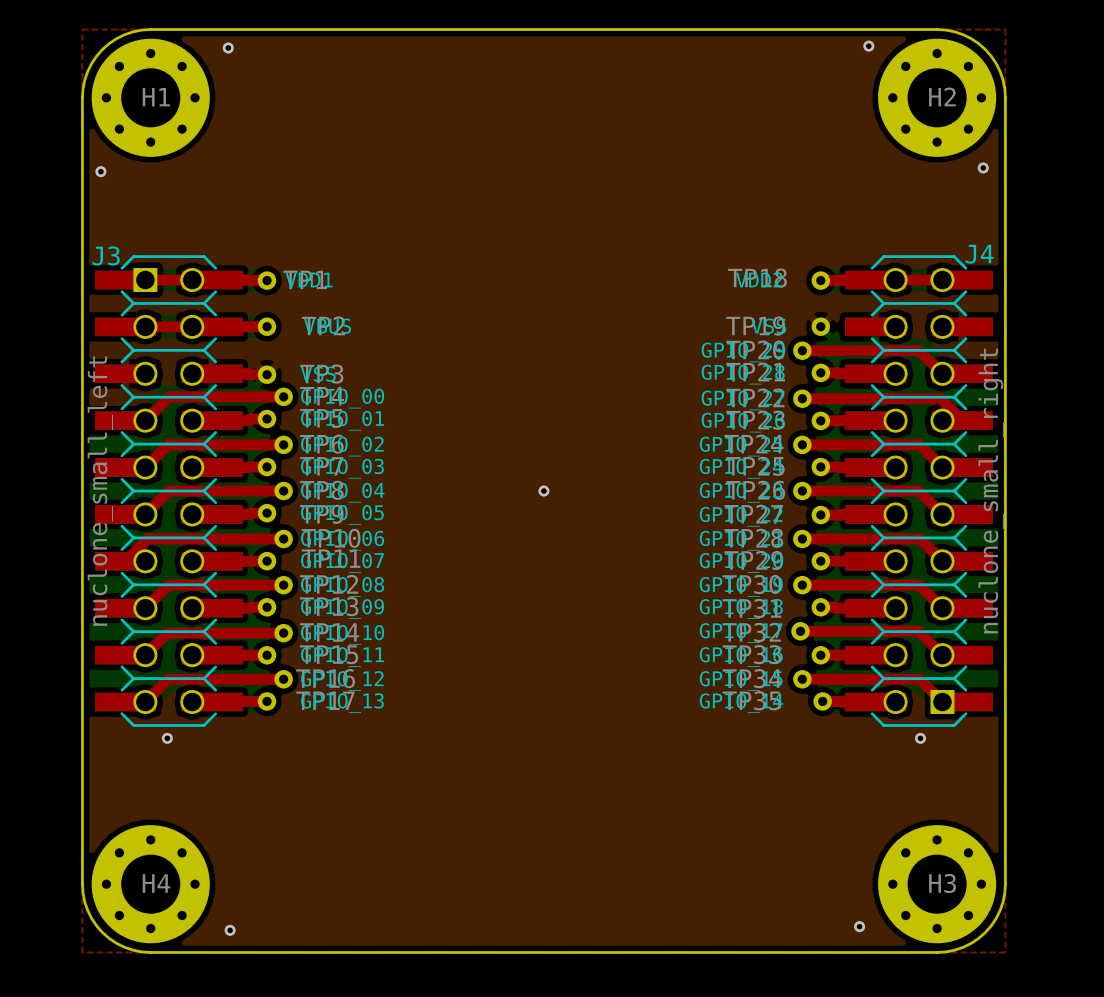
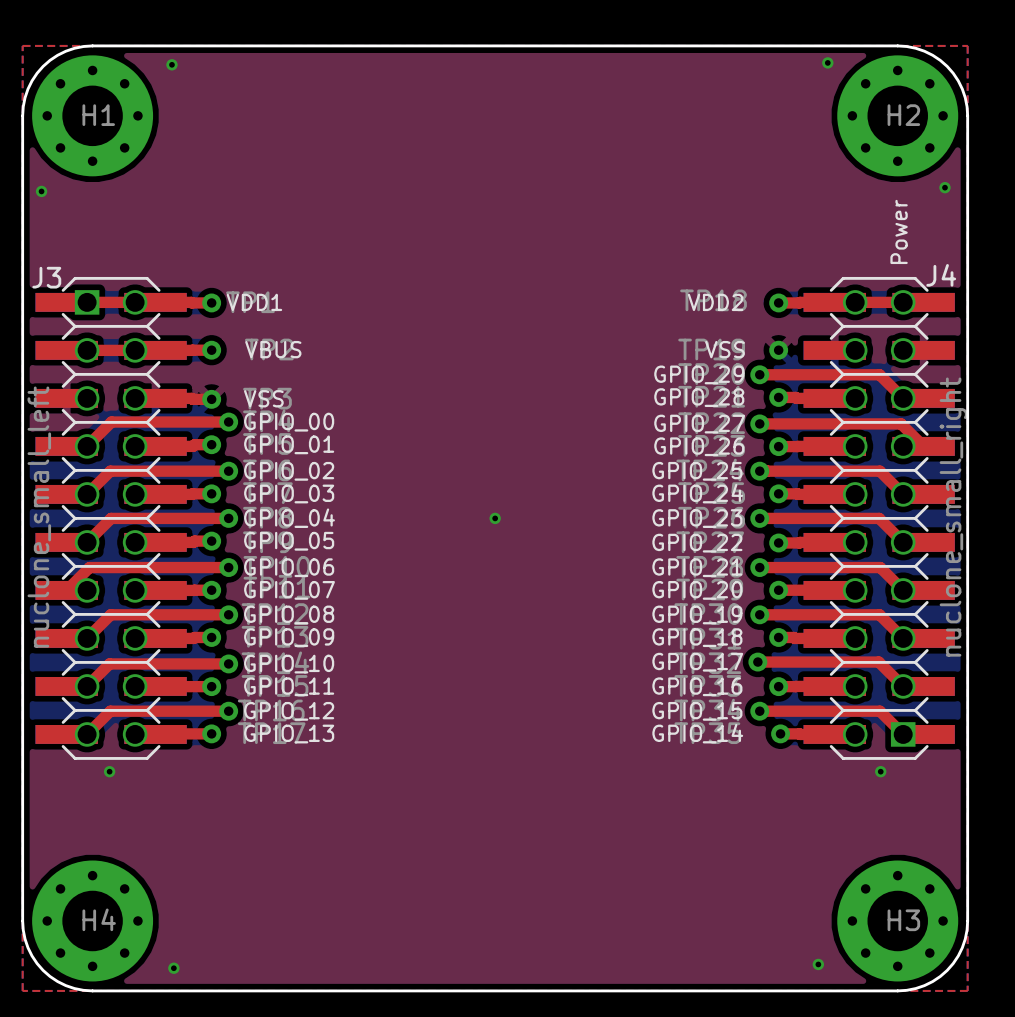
text: none -> Power (899, 231)

